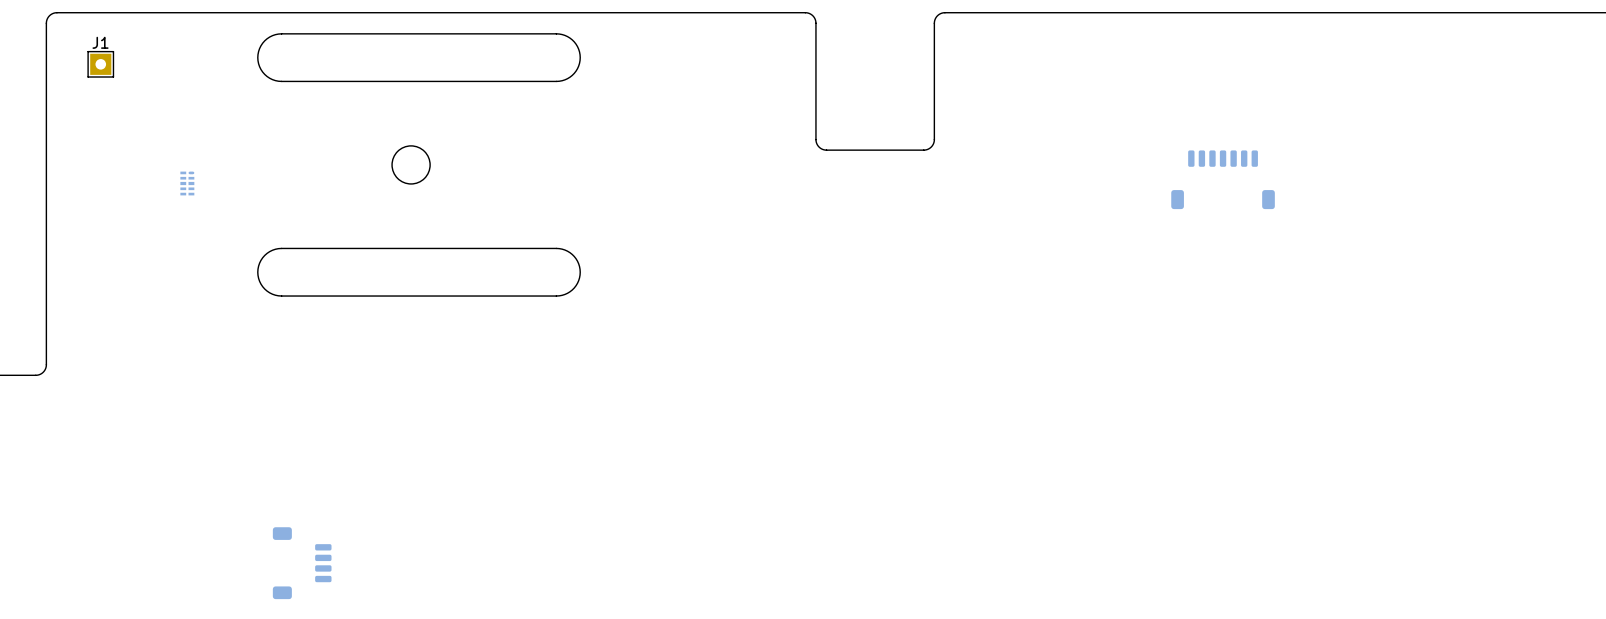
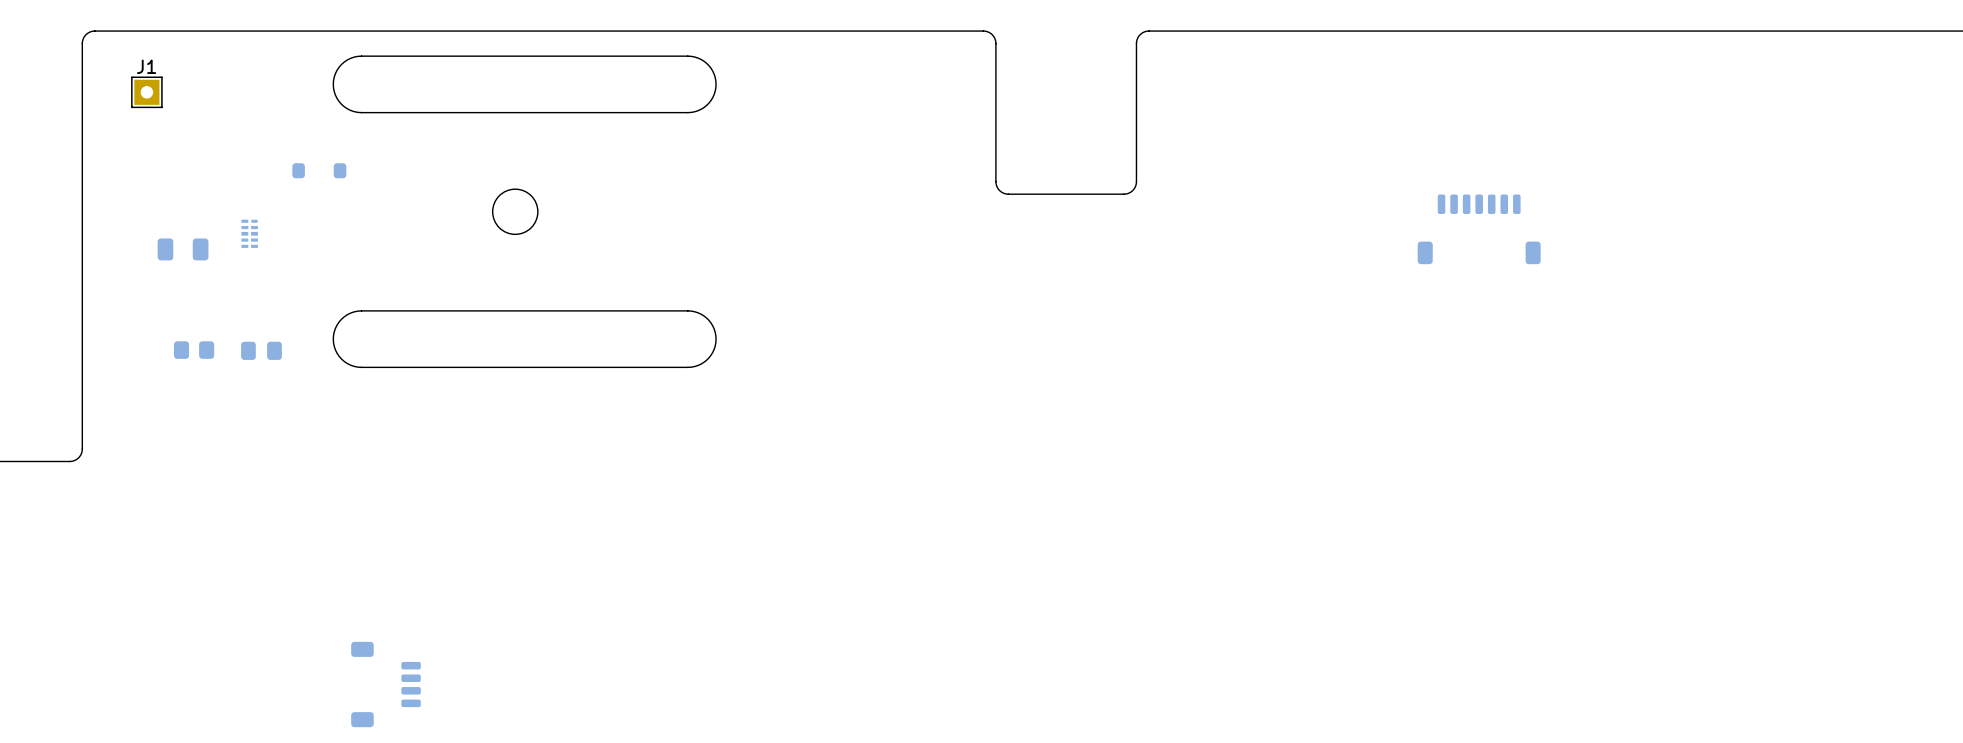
part: none -> (319, 170)
part: none -> (183, 249)
part: none -> (194, 350)
part: none -> (261, 350)

